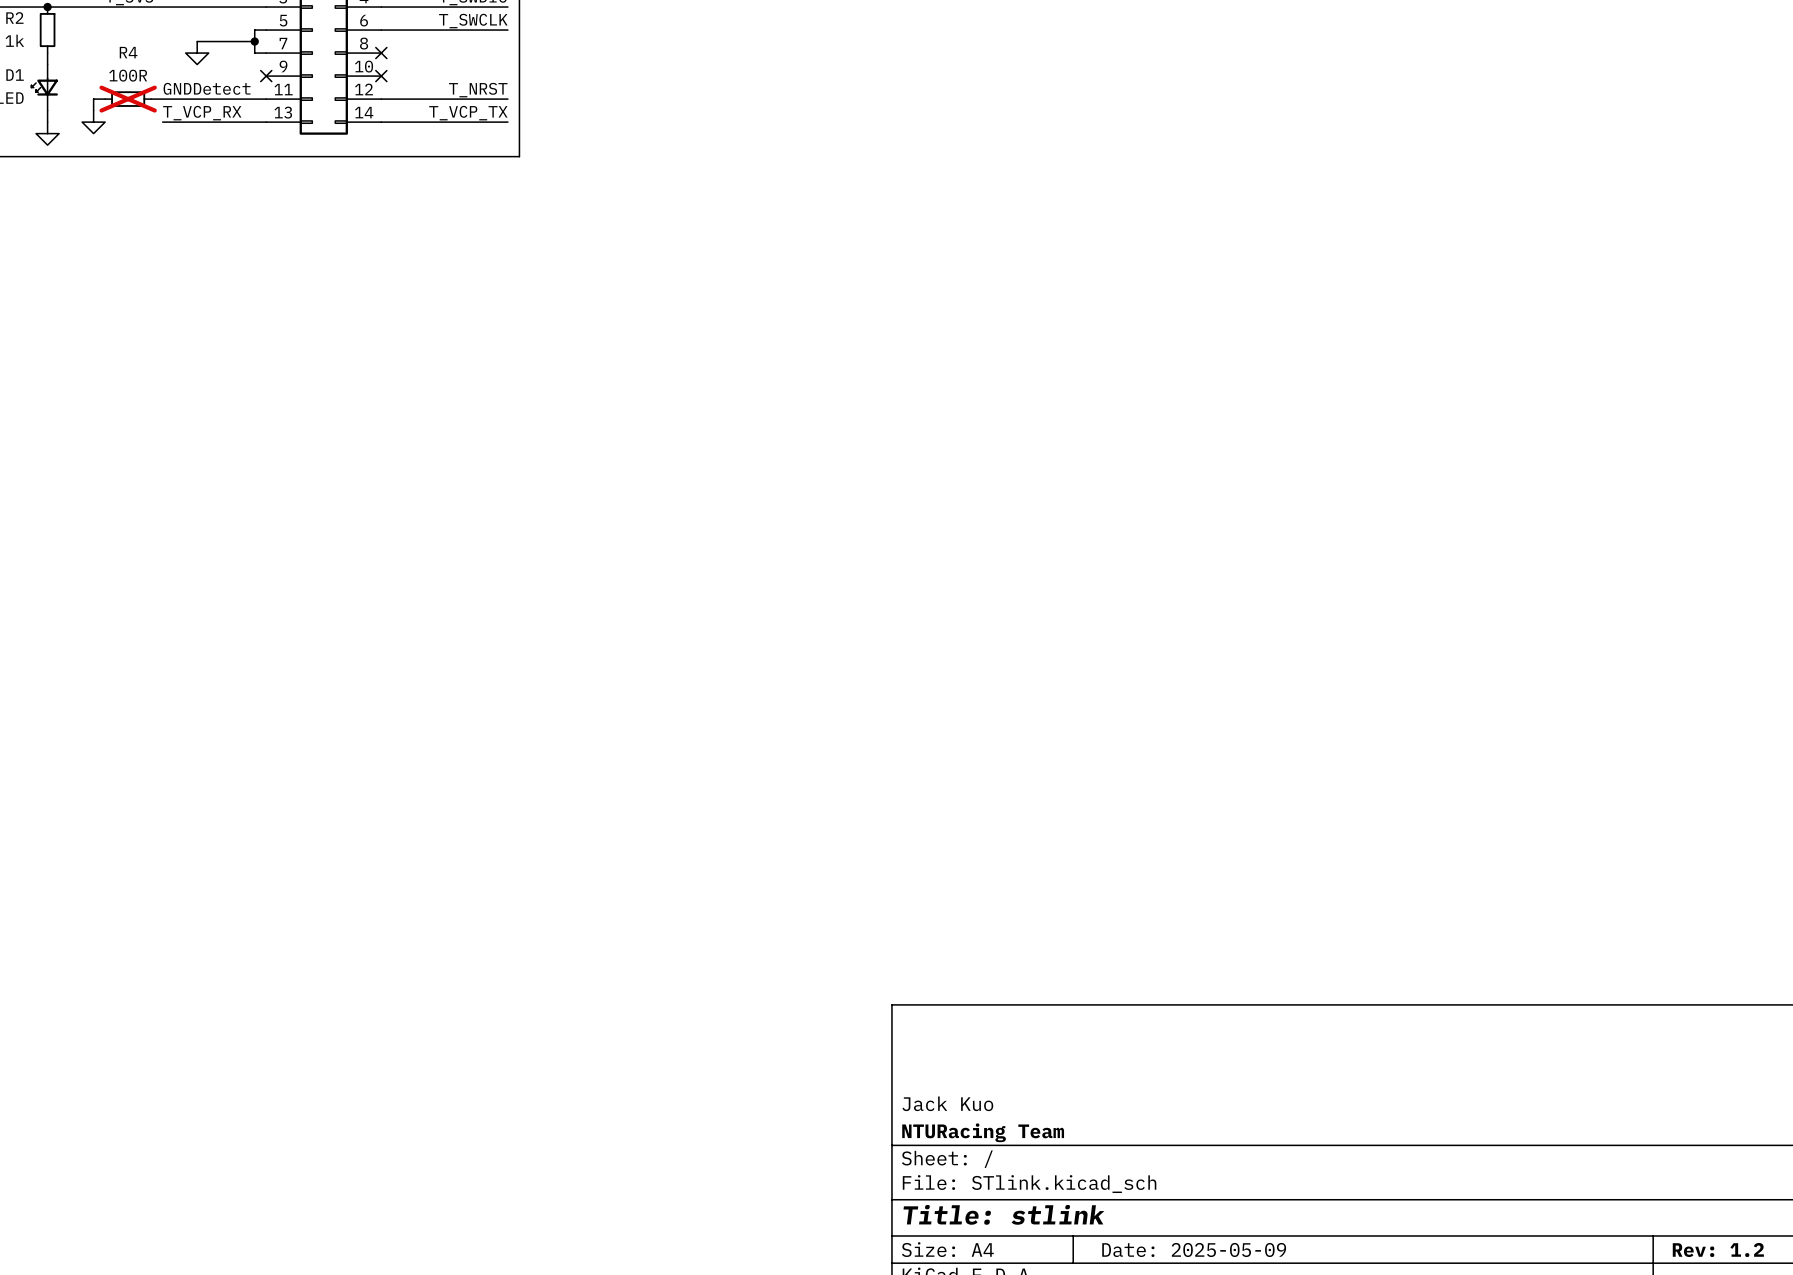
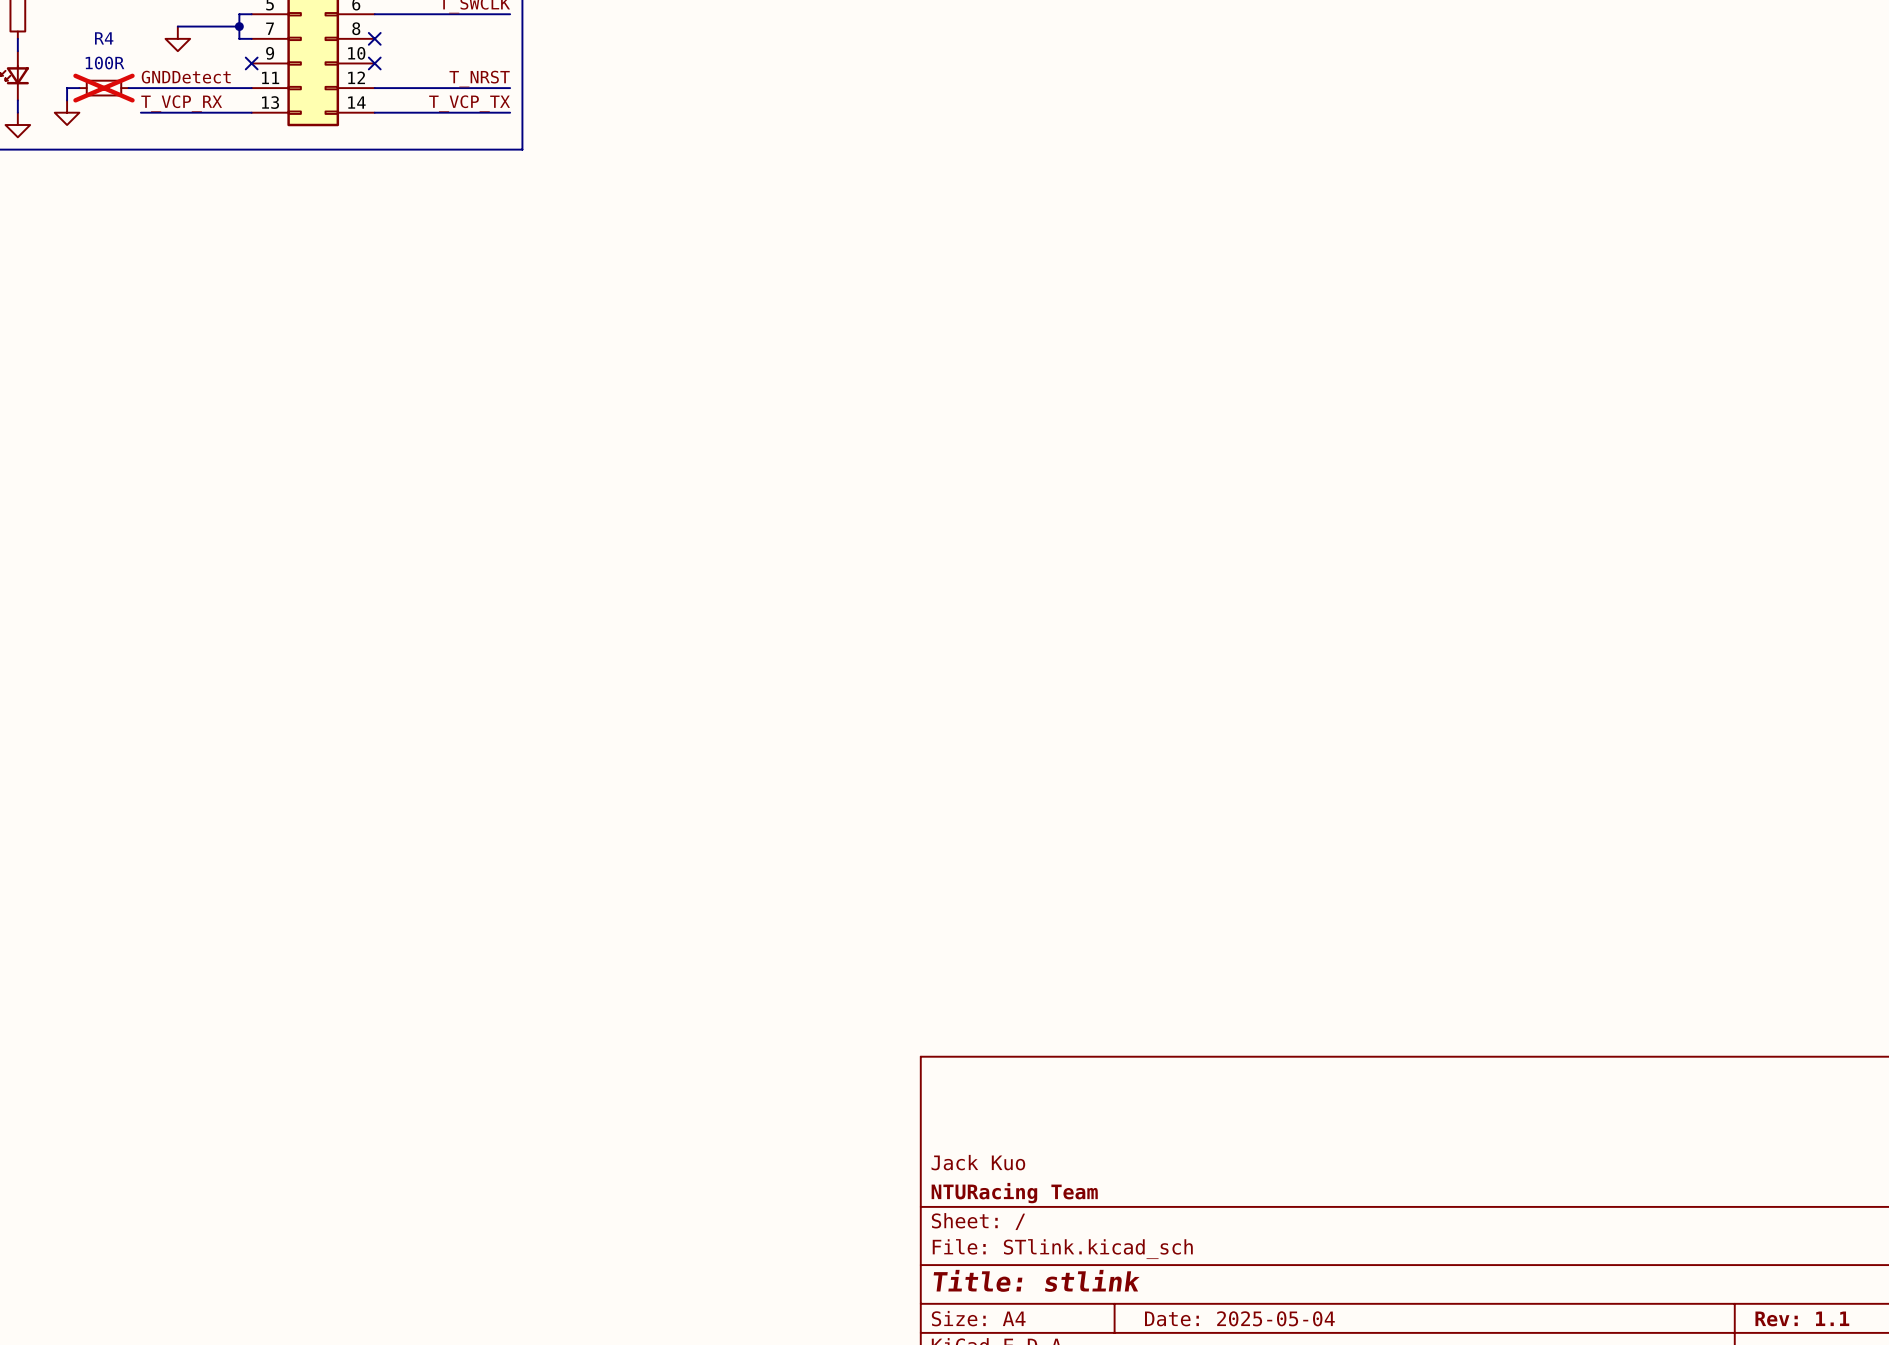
title block: Date: 2025-05-09 (1194, 1249) -> Date: 2025-05-04 (1239, 1318)
title block: Rev: 1.2 (1718, 1249) -> Rev: 1.1 (1802, 1318)

